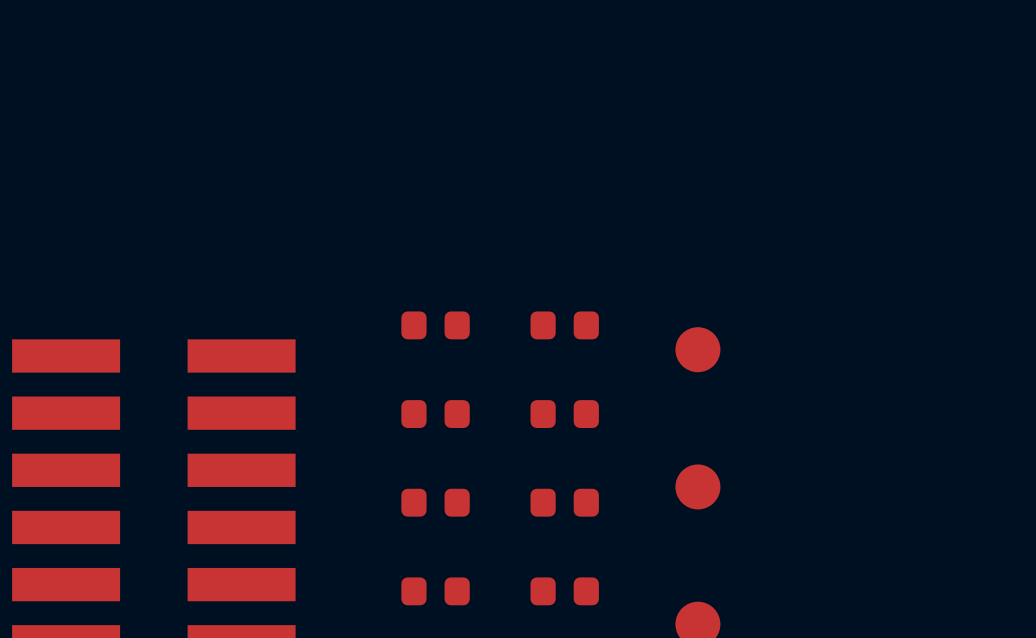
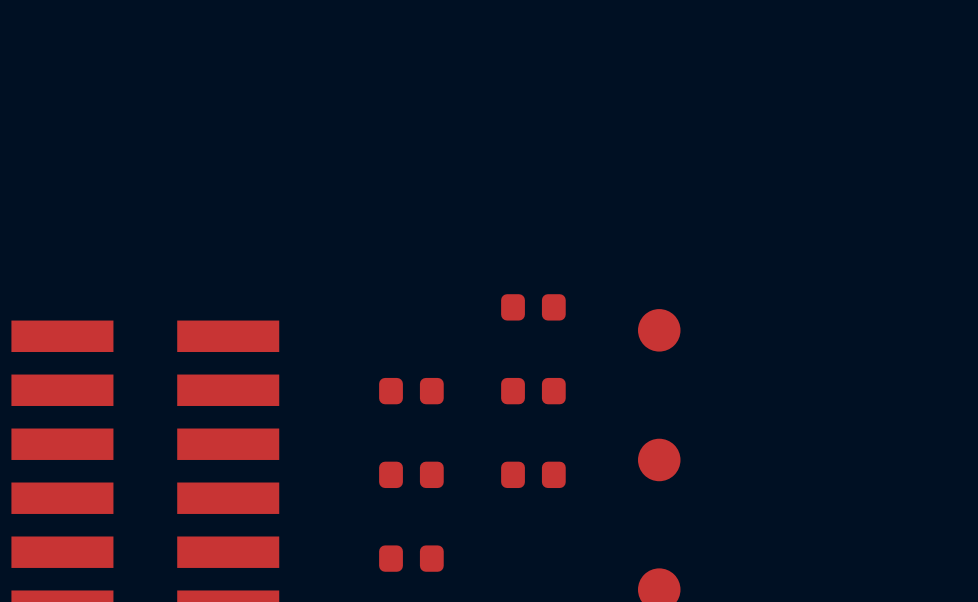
part: (435, 325) -> none
part: (564, 591) -> none

